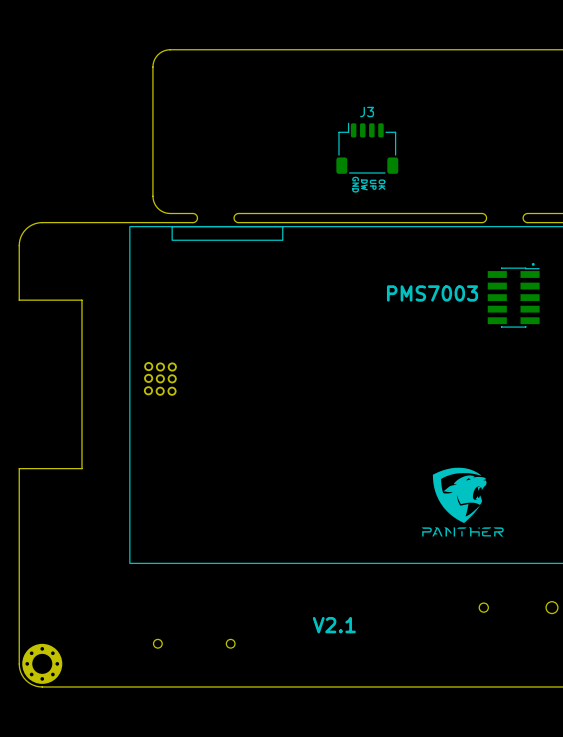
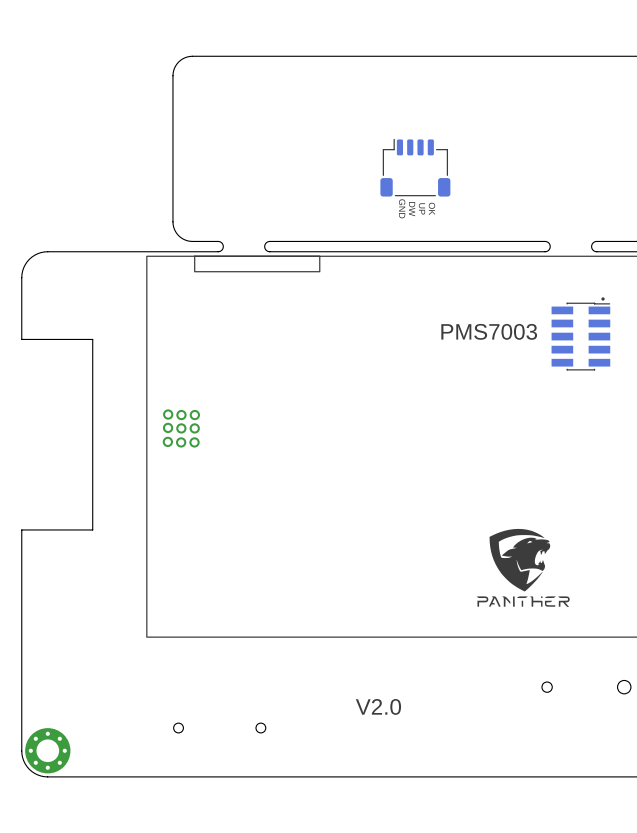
J3 name: J3 (367, 111) -> none
text: V2.1 (334, 625) -> V2.0 (378, 706)

